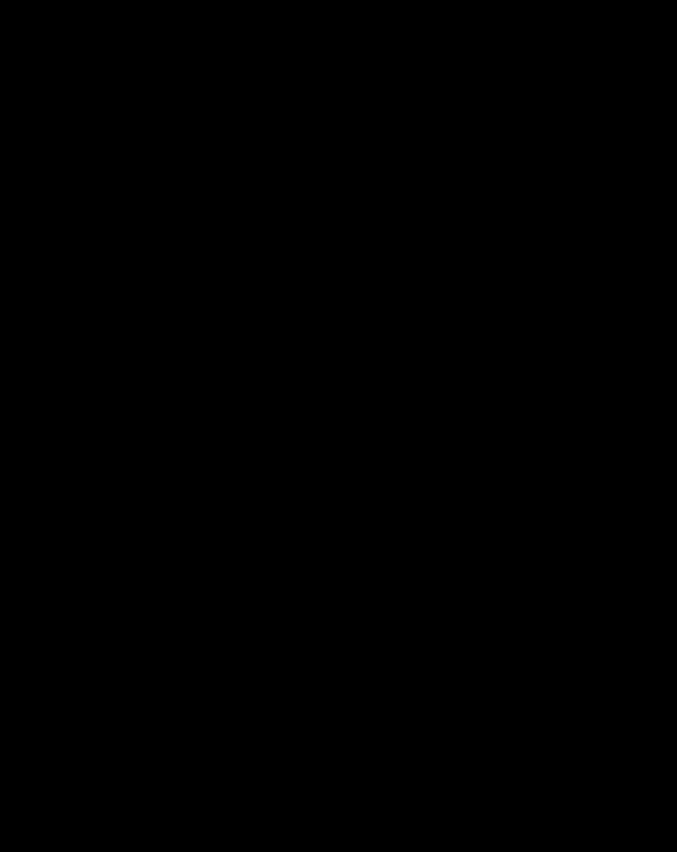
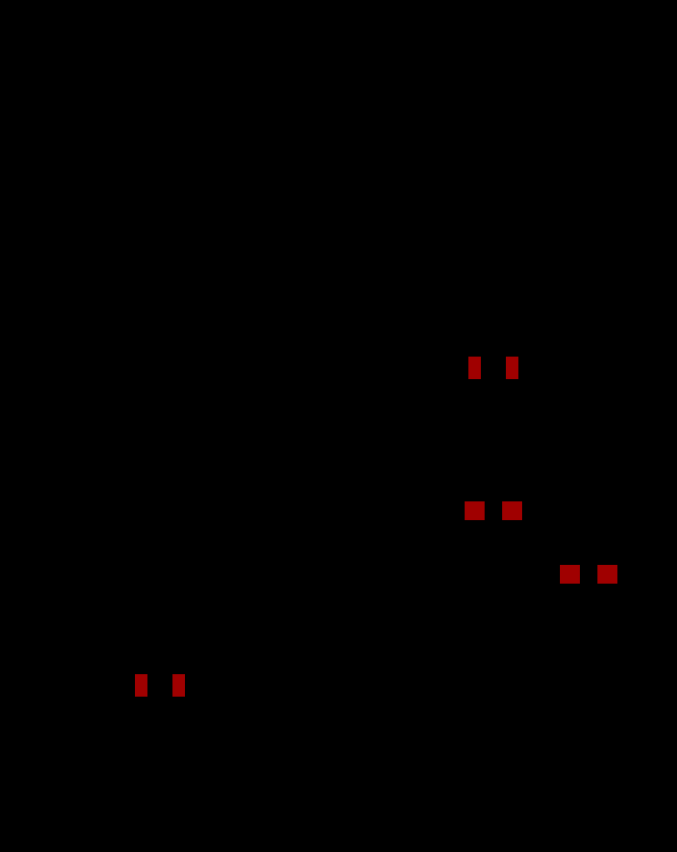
part: none -> (493, 367)
part: none -> (493, 510)
part: none -> (588, 574)
part: none -> (159, 685)

